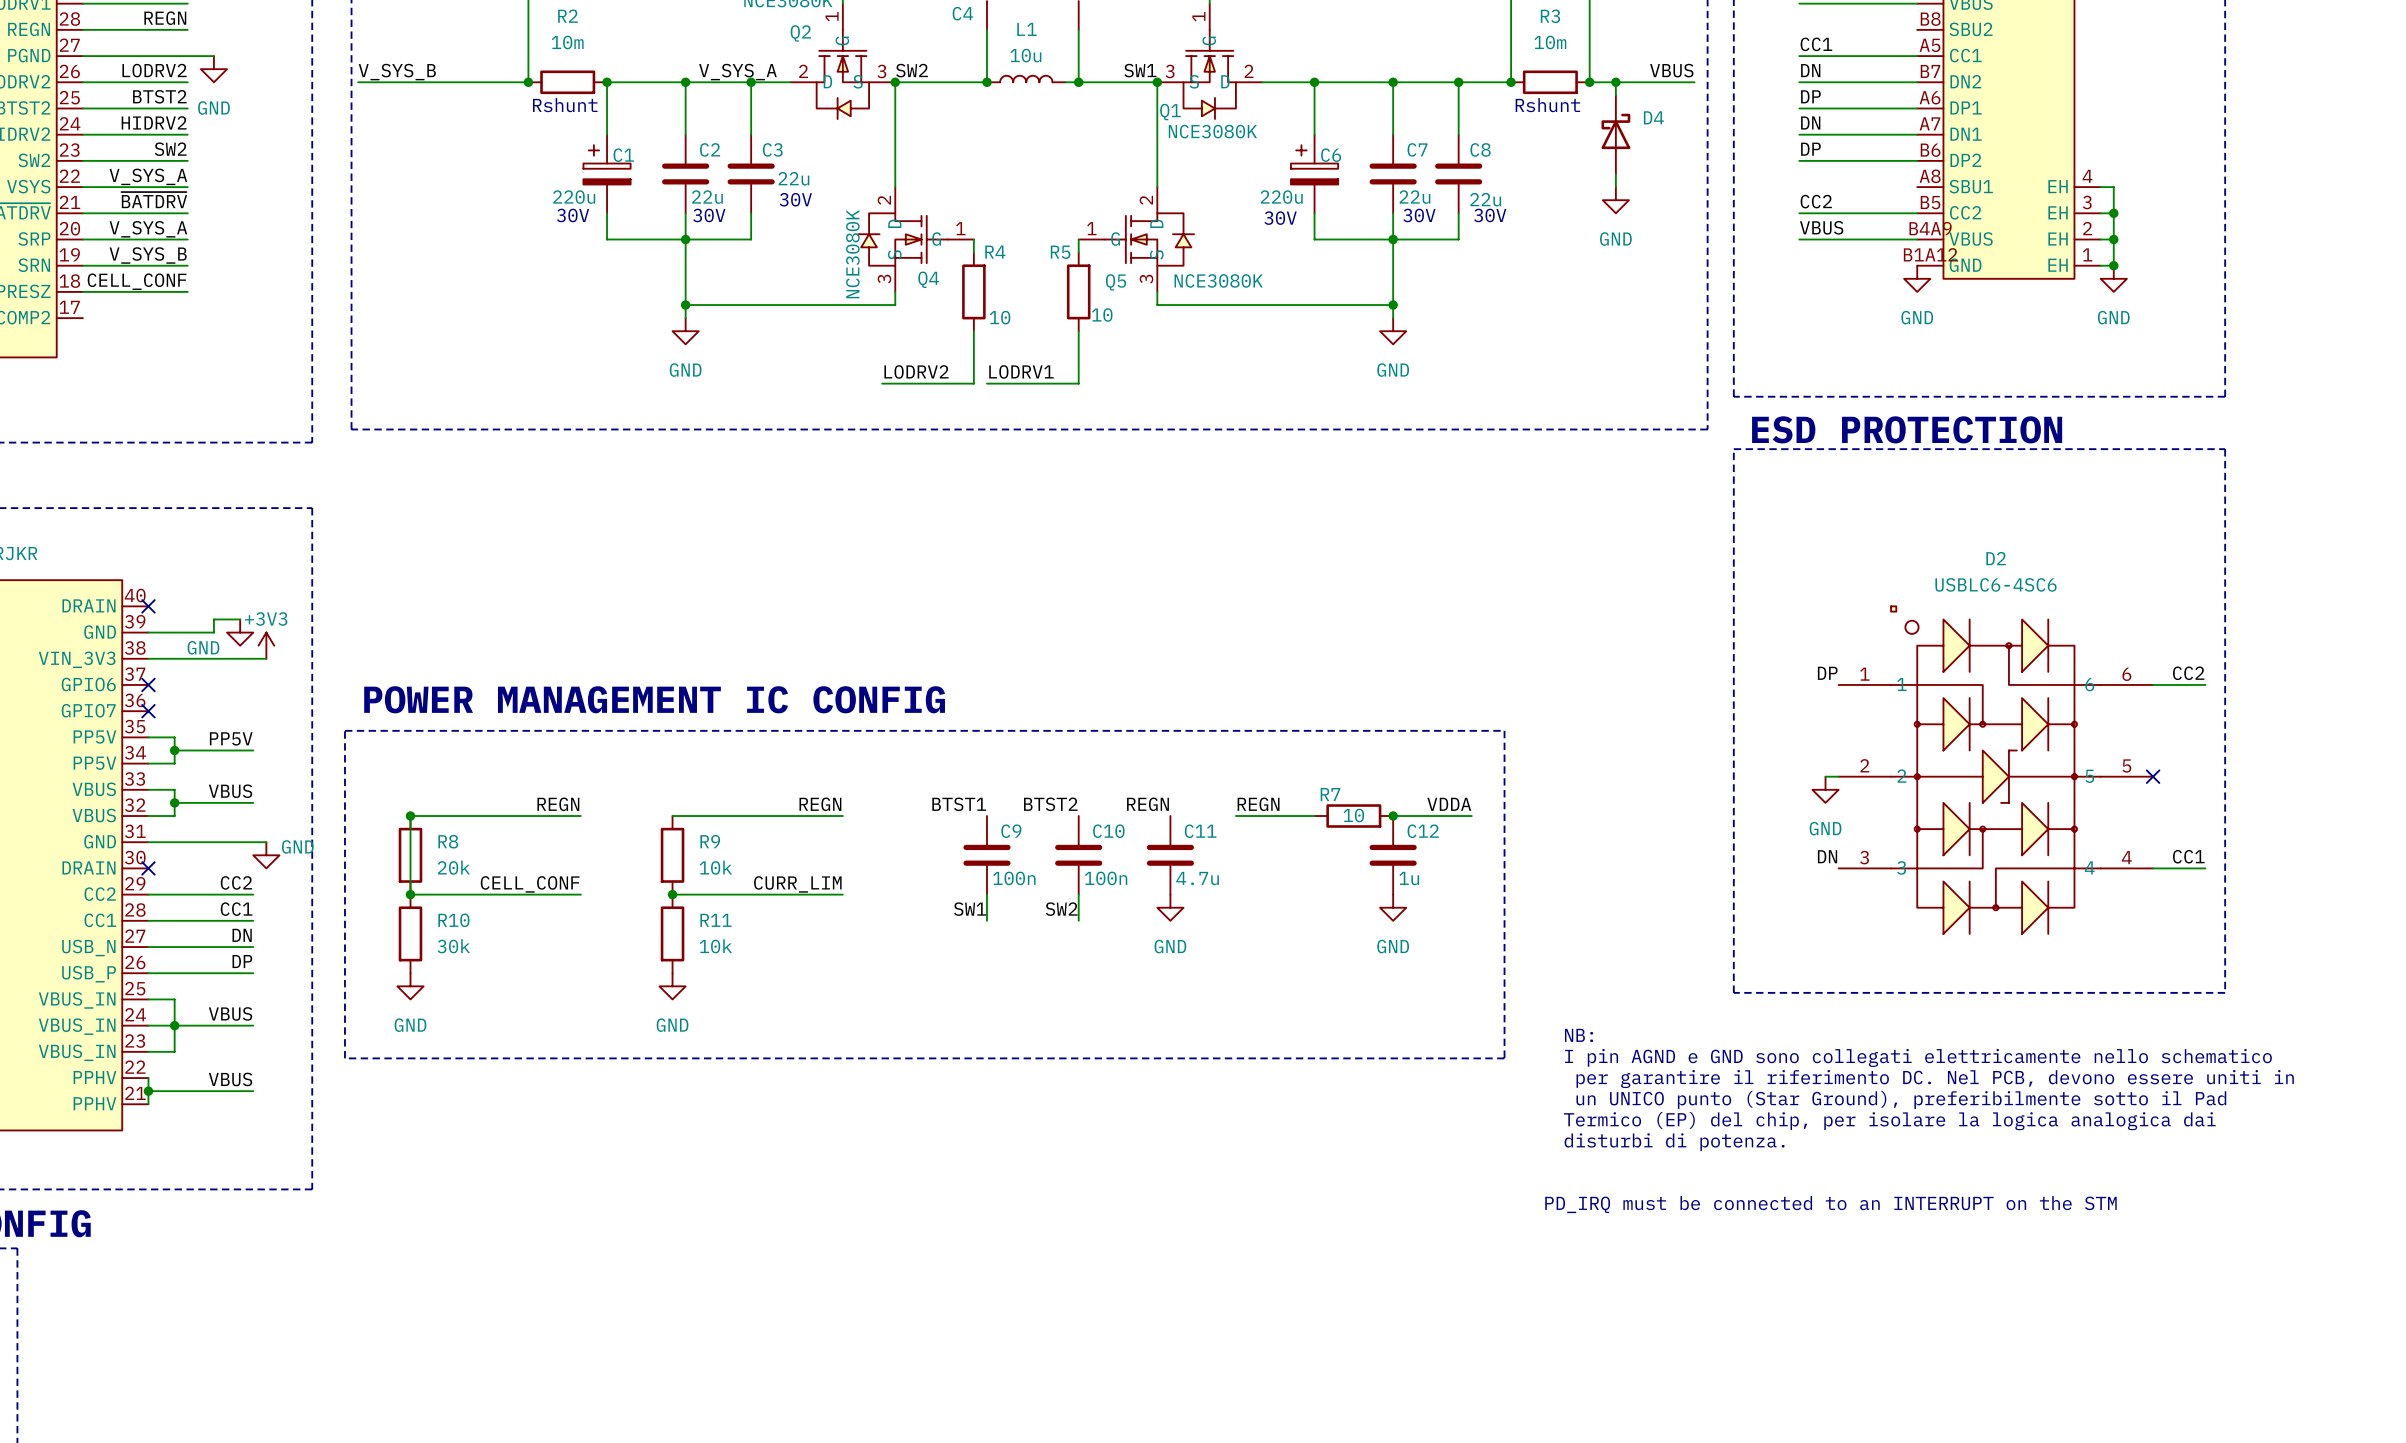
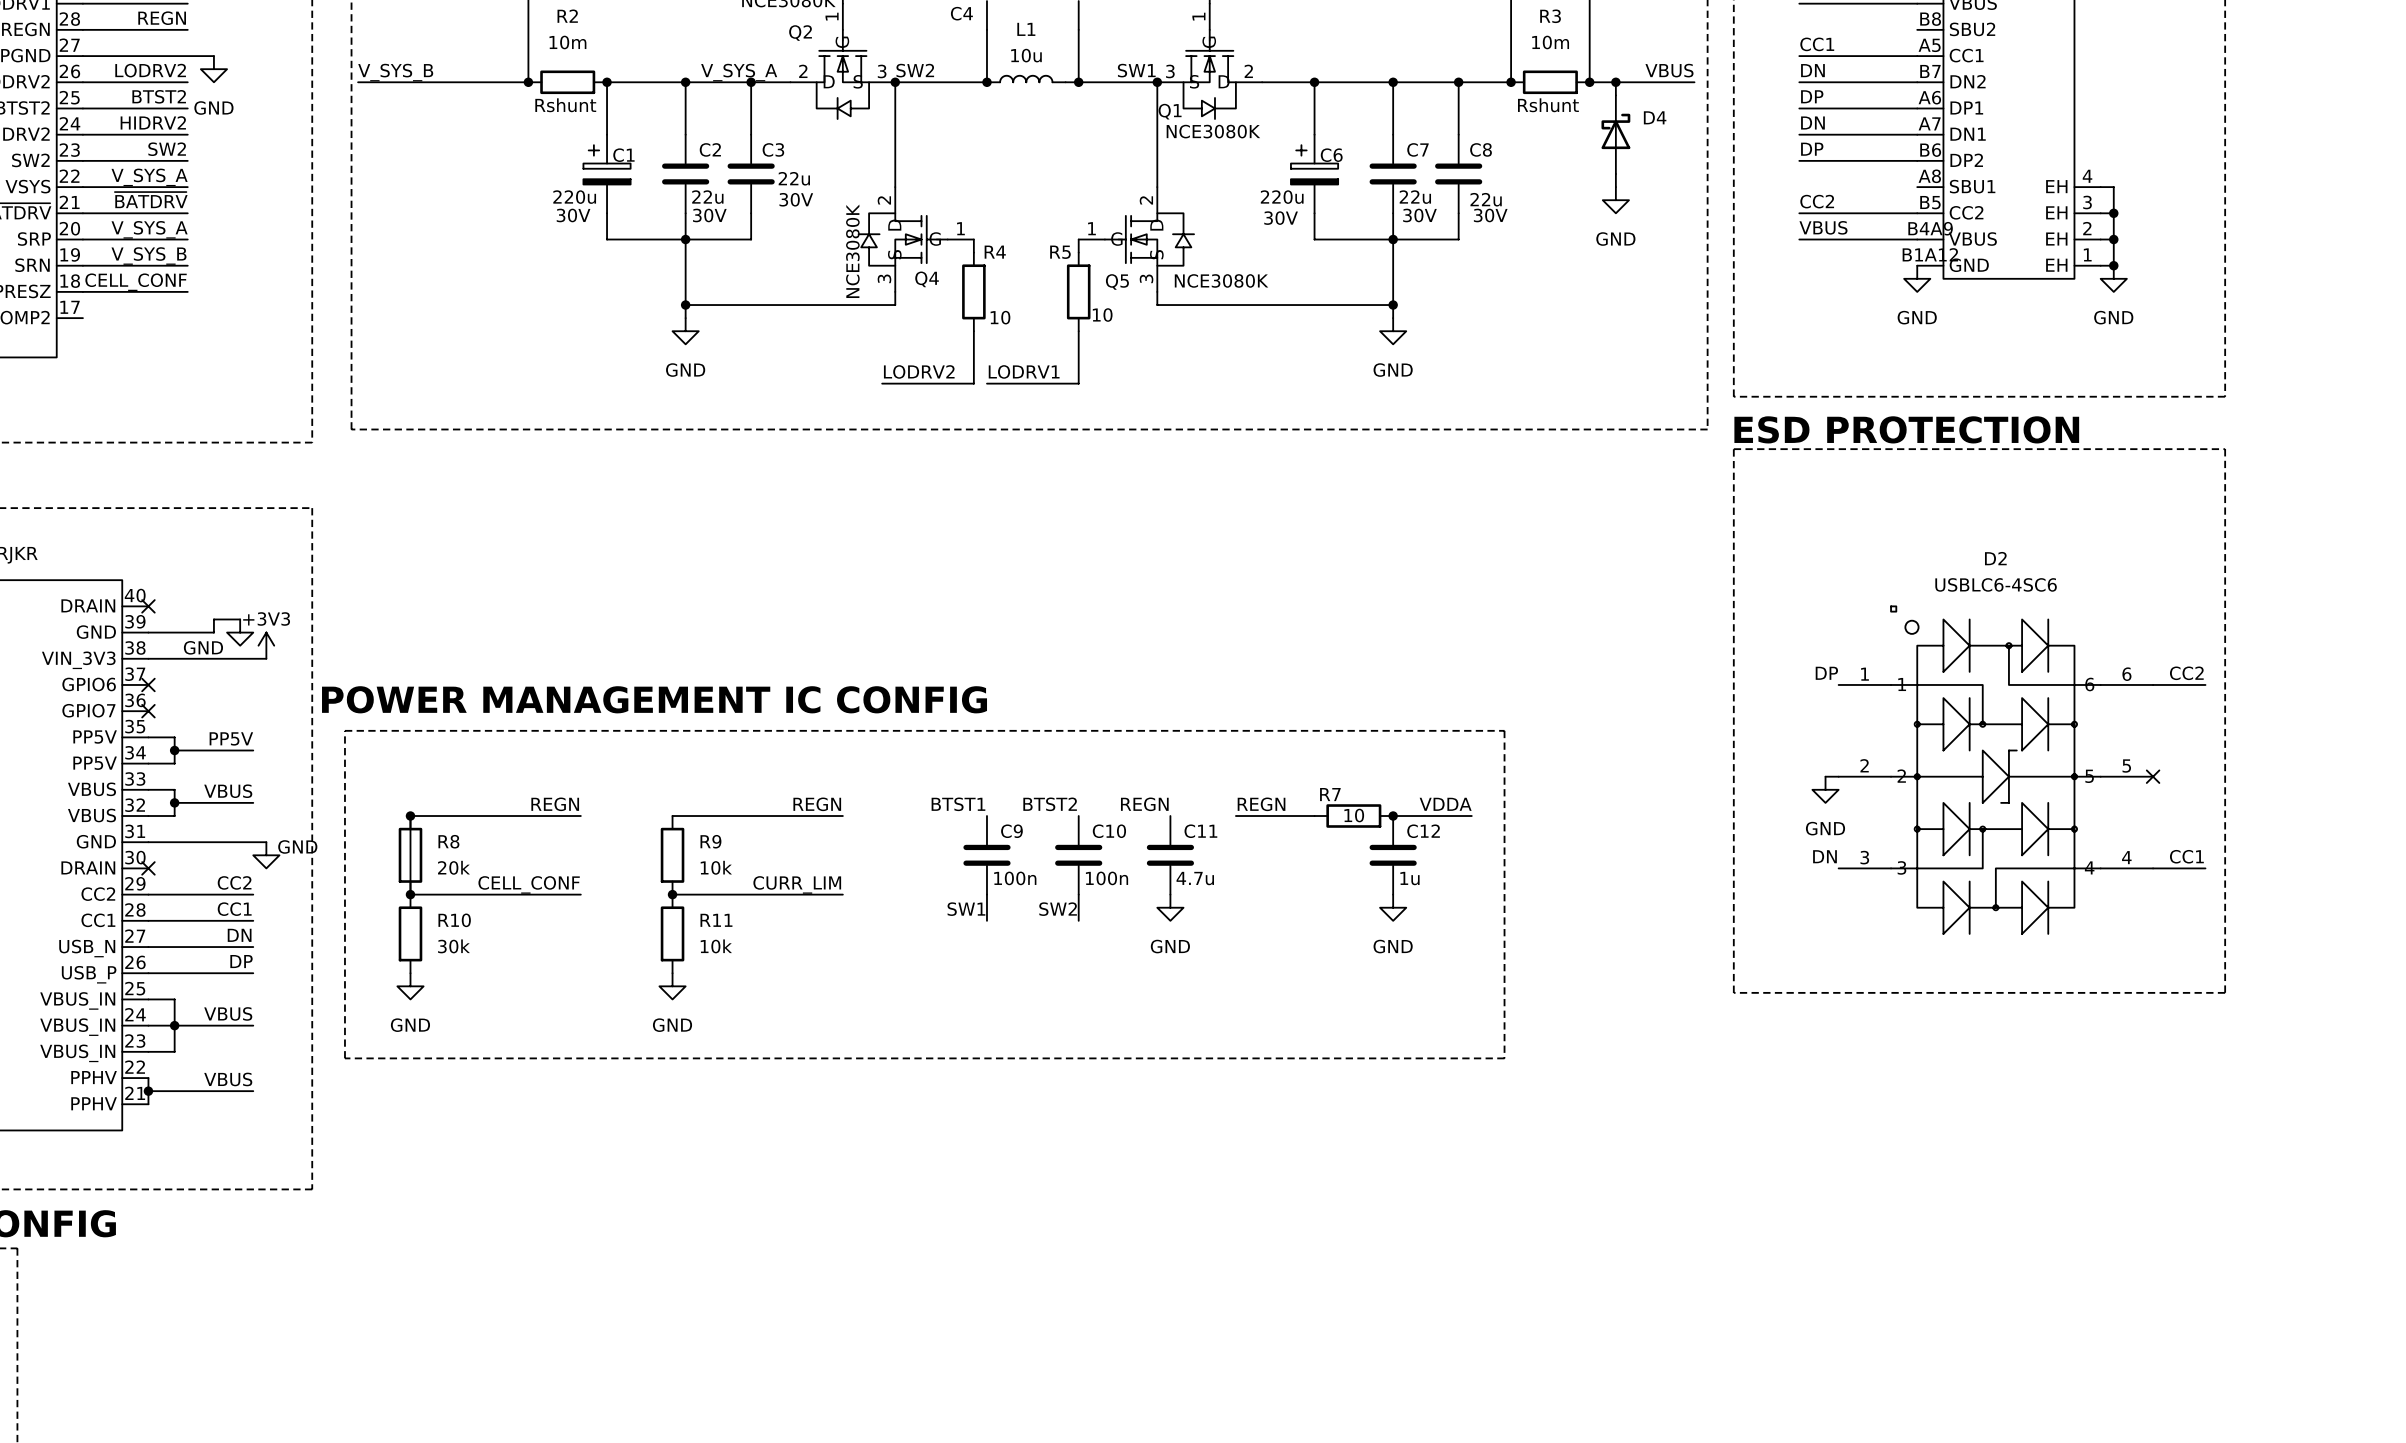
text: NB: (1579, 1035) -> none
text: I pin AGND e GND sono collegati elettricamente nello schematico (1918, 1057) -> none
text: per garantire il riferimento DC. Nel PCB, devono essere uniti in (1935, 1079) -> none
text: un UNICO punto (Star Ground), preferibilmente sotto il Pad (1901, 1099) -> none
text: Termico (EP) del chip, per isolare la logica analogica dai (1889, 1121) -> none
text: disturbi di potenza. (1674, 1142) -> none
text: PD_IRQ must be connected to an INTERRUPT on the STM (1830, 1204) -> none

